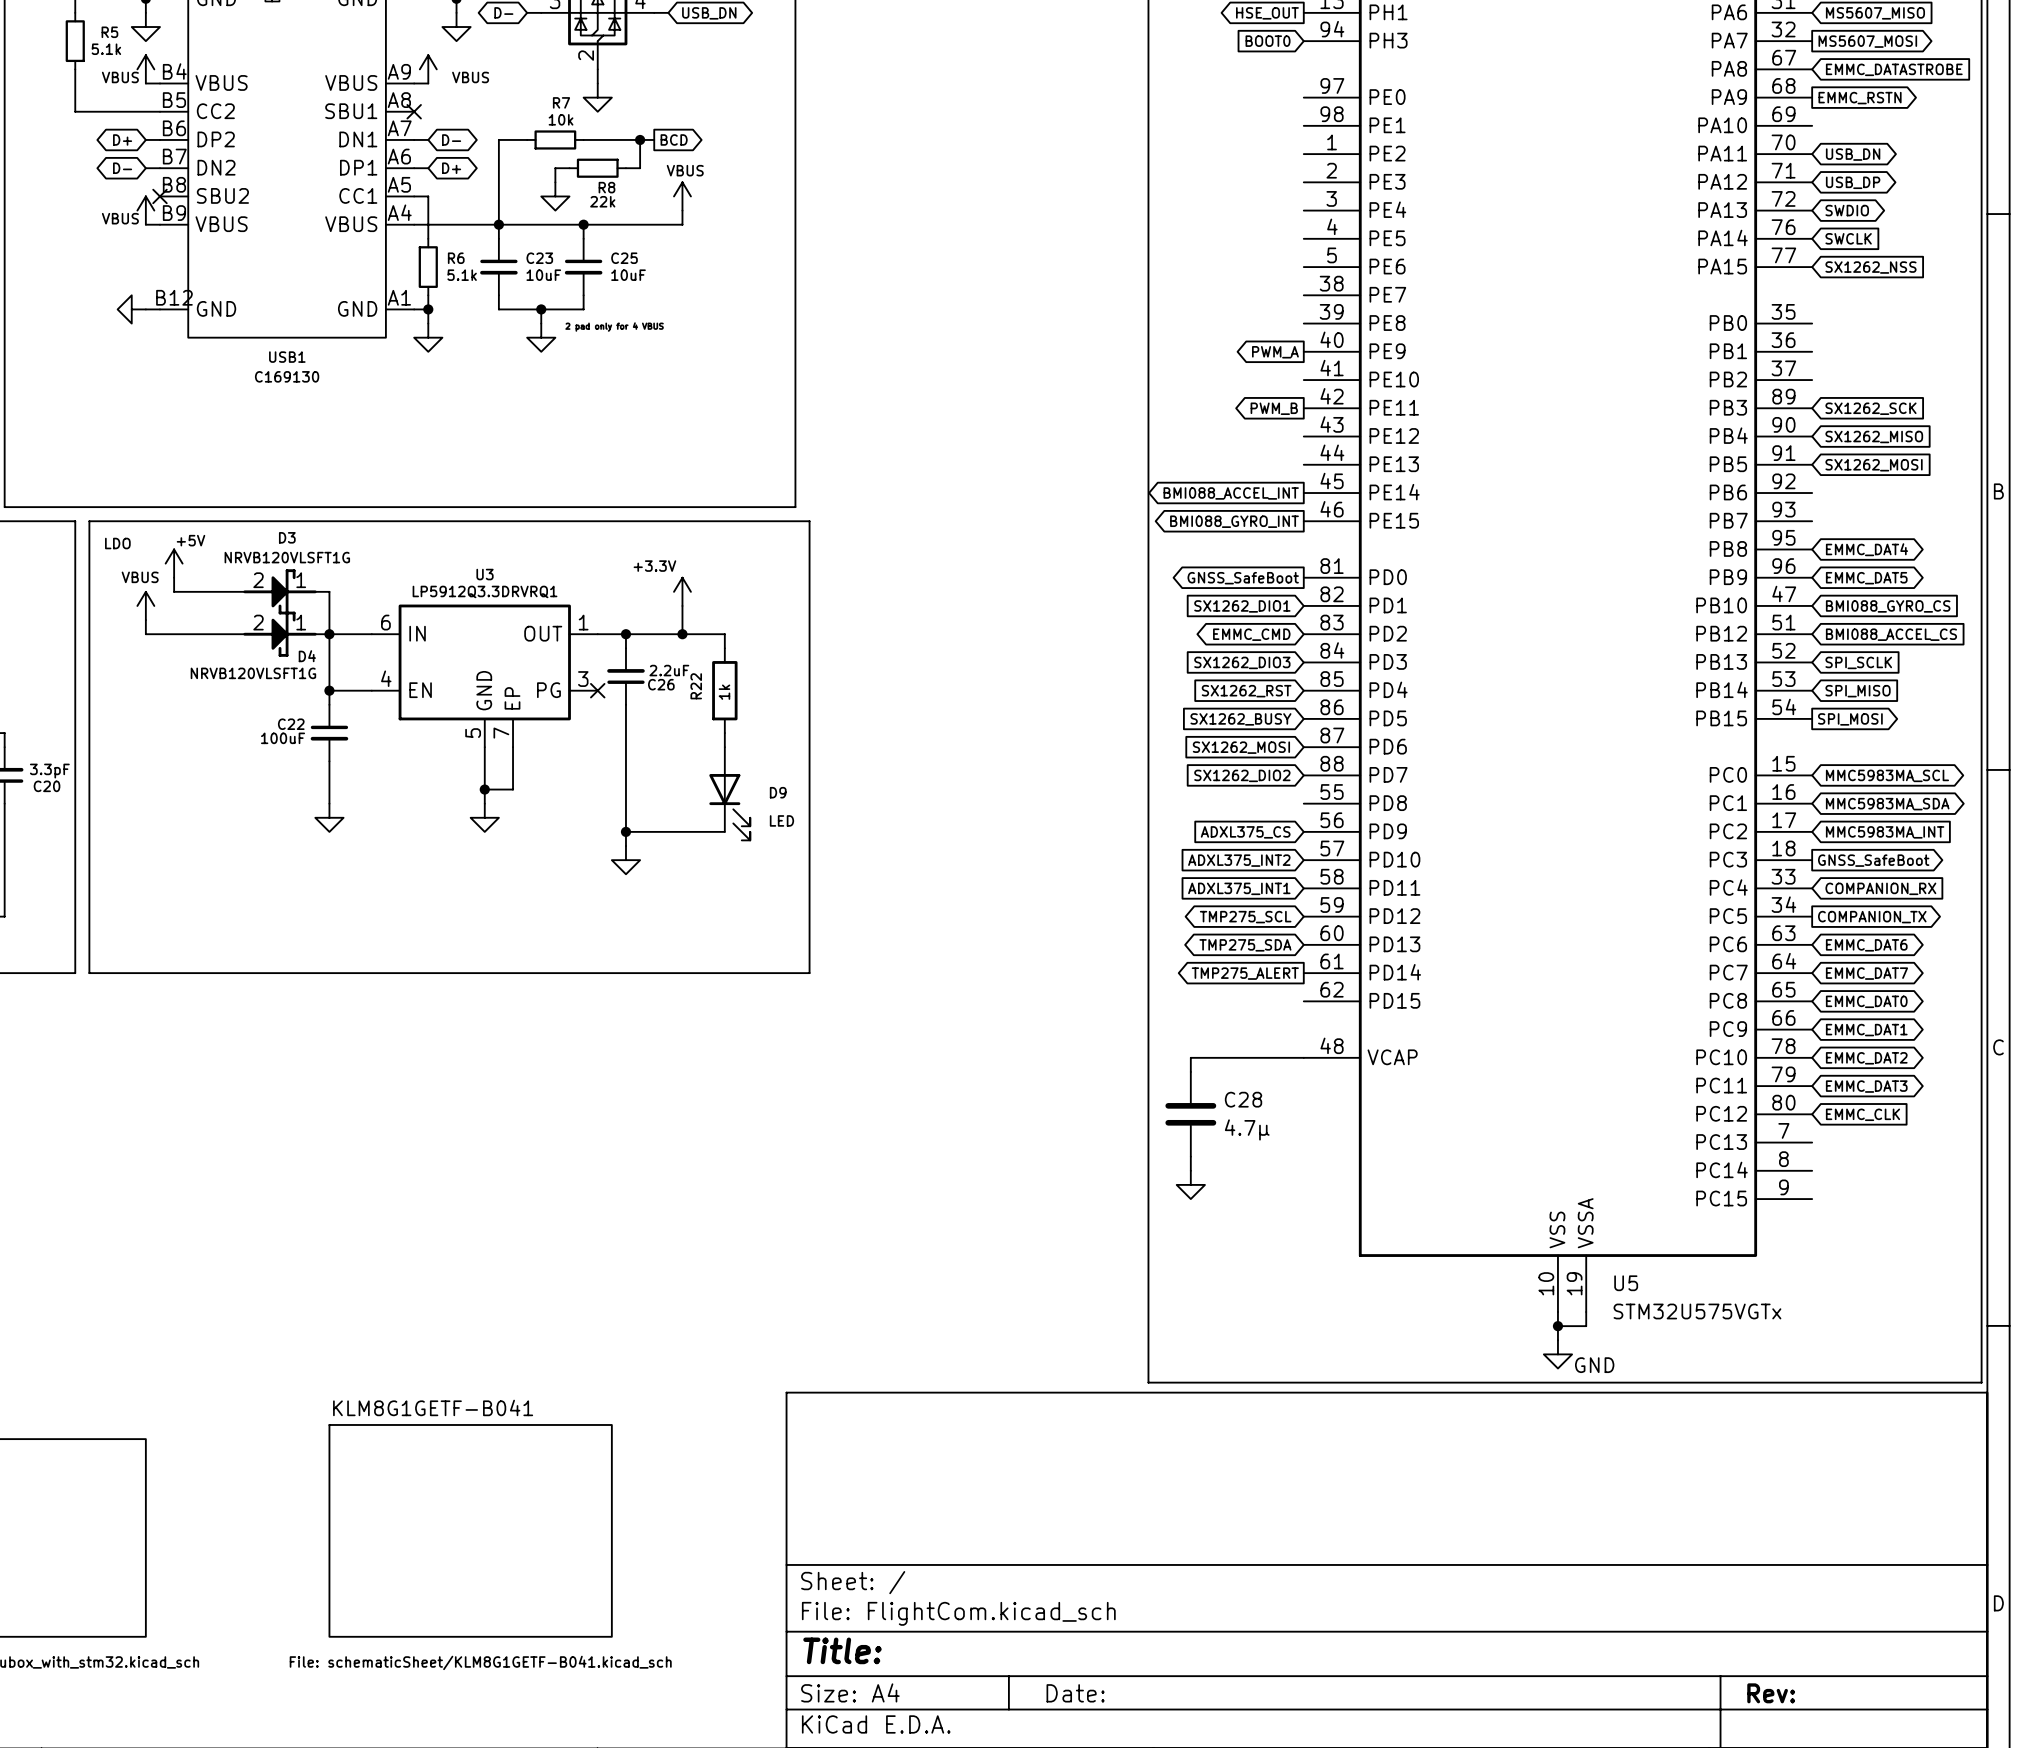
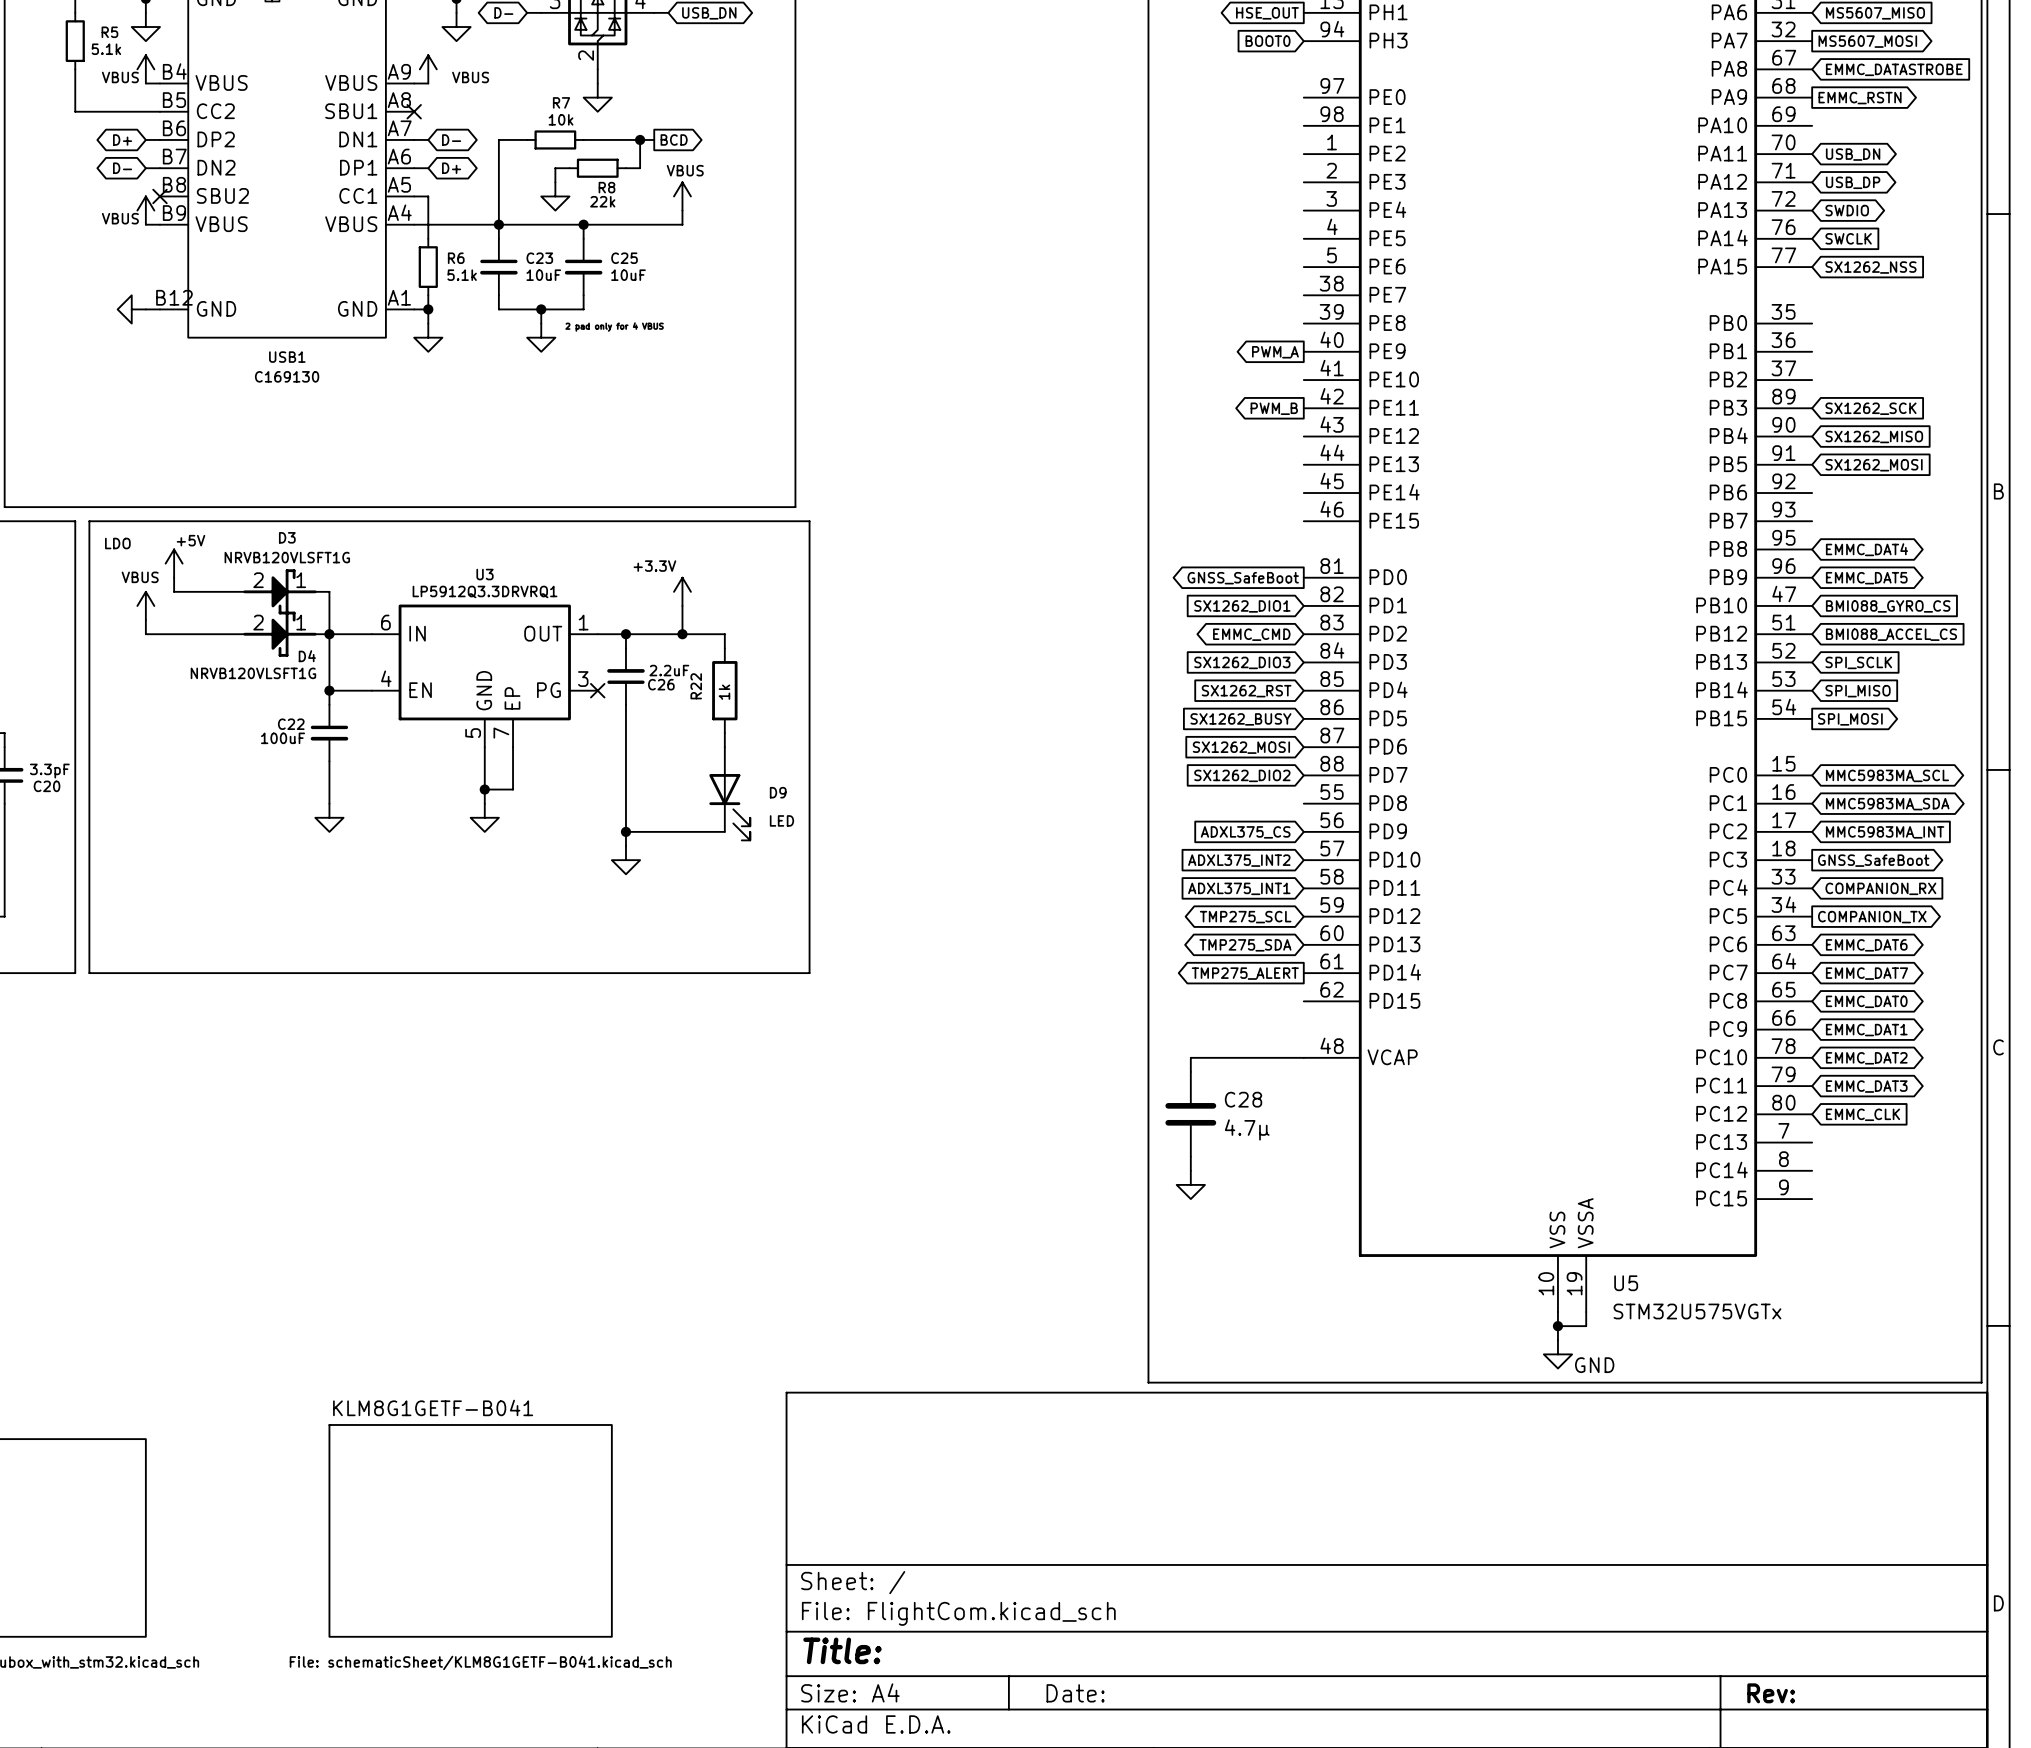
global label: BMI088_ACCEL_INT (1231, 493) -> none
global label: BMI088_GYRO_INT (1234, 521) -> none

